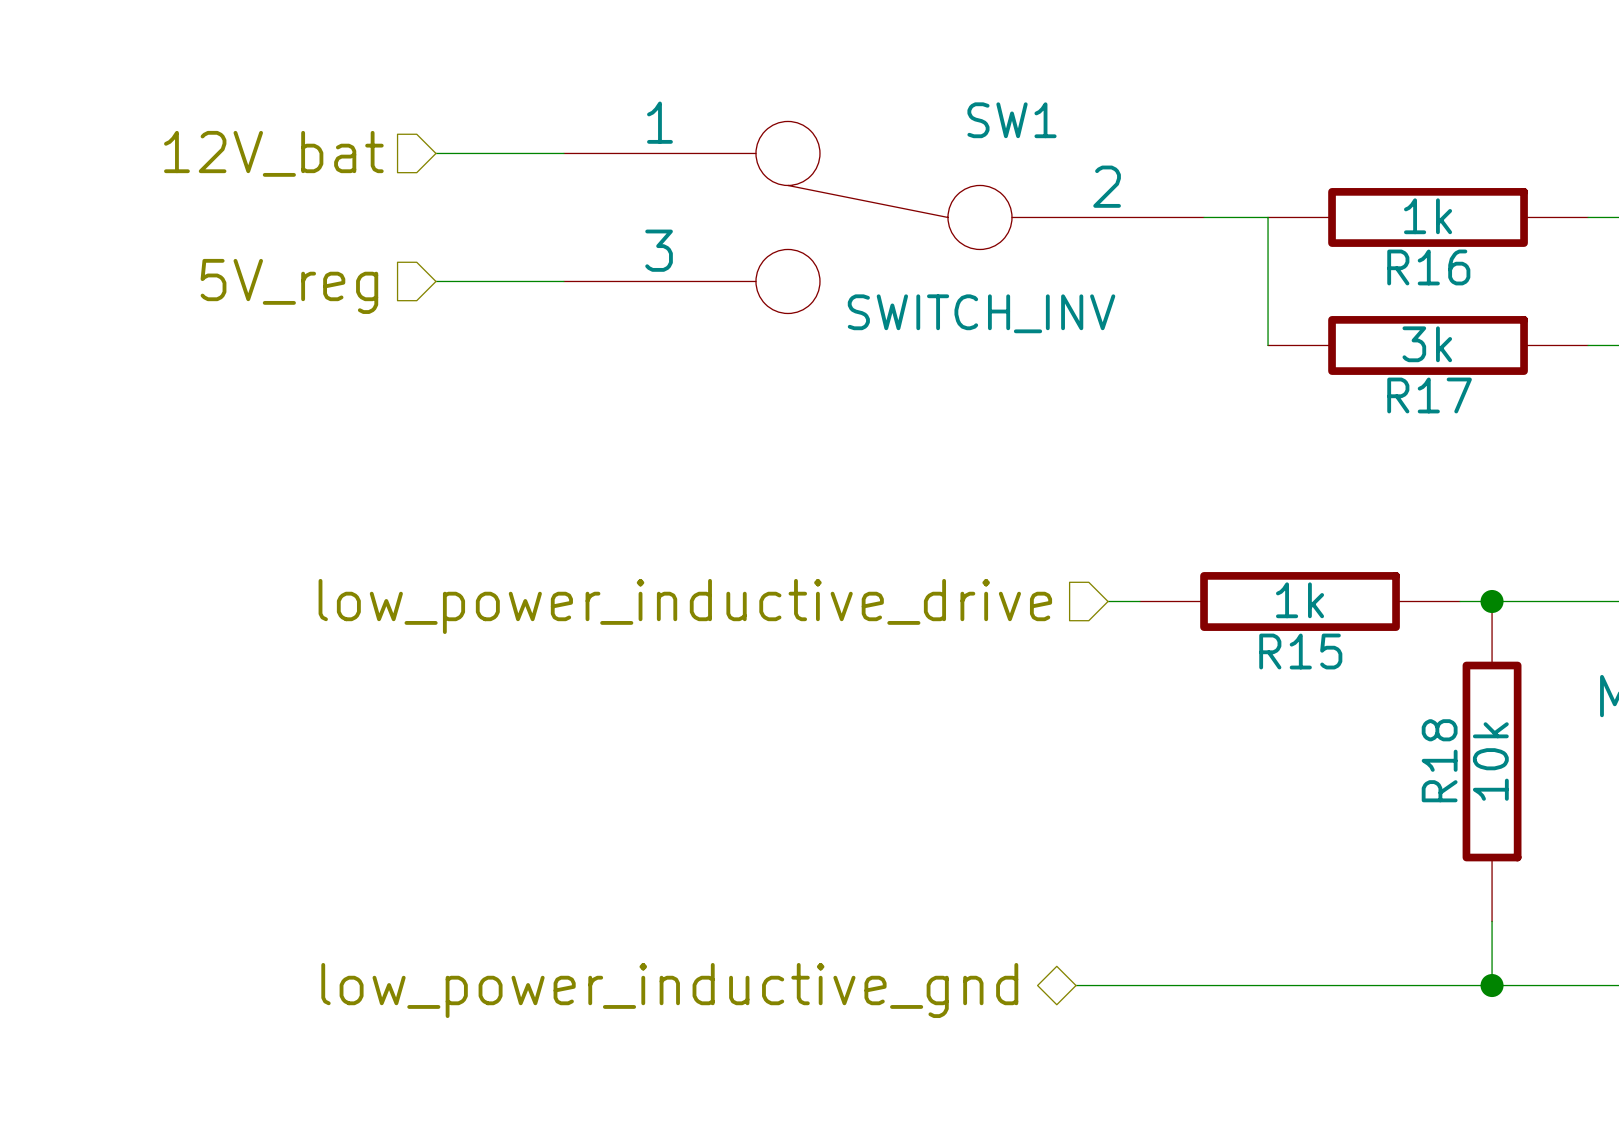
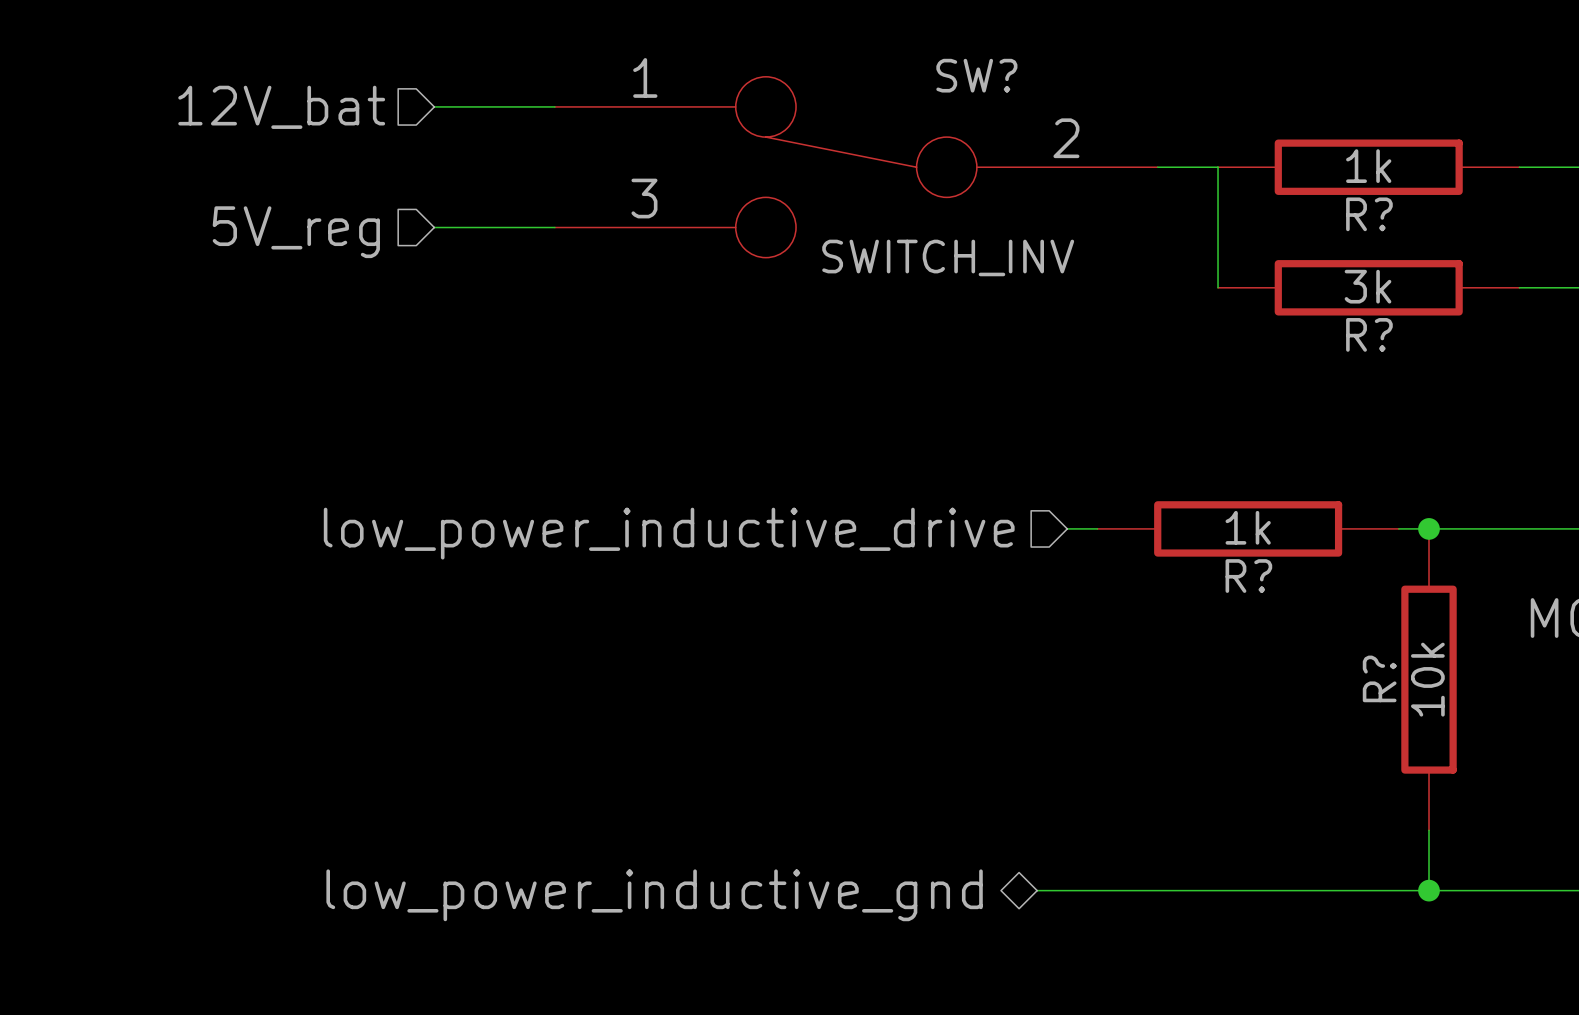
SW1 name: SW1 (1012, 120) -> SW? (976, 75)
R16 name: R16 (1428, 267) -> R? (1369, 214)
R17 name: R17 (1429, 395) -> R? (1369, 334)
R15 name: R15 (1300, 651) -> R? (1248, 576)
R18 name: R18 (1439, 760) -> R? (1379, 678)

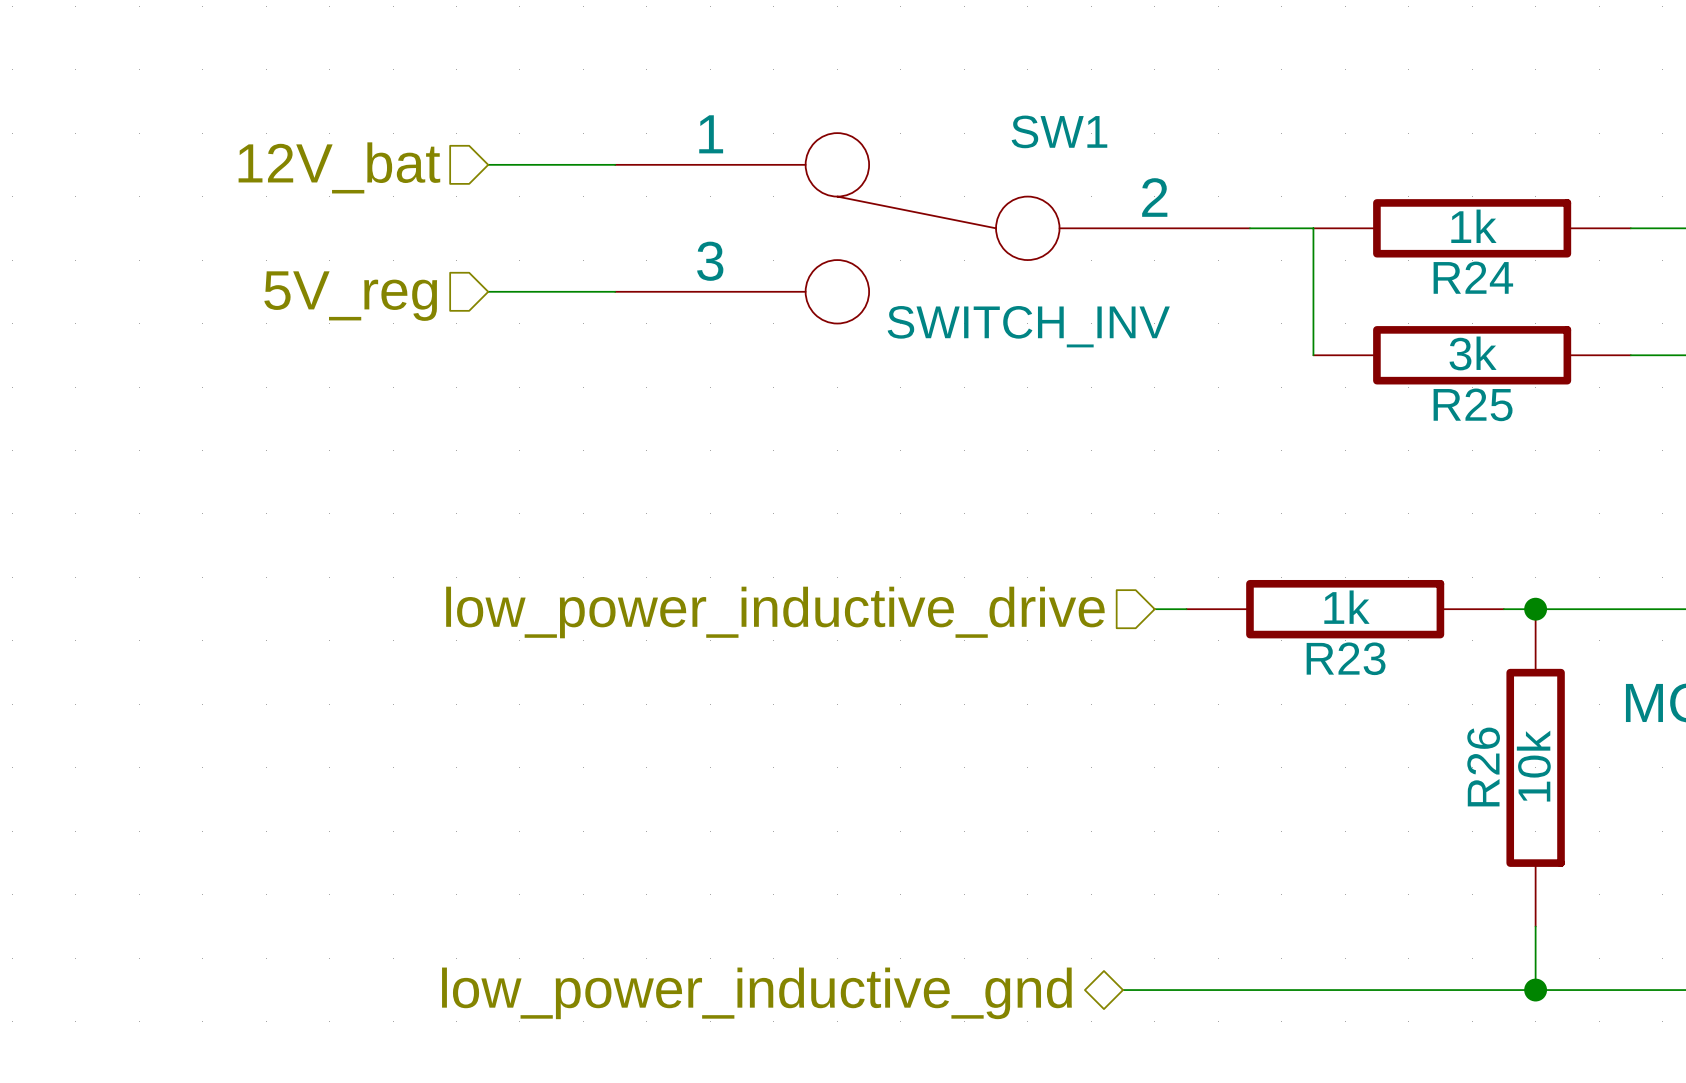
SW? name: SW? (976, 75) -> SW1 (1059, 131)
R? name: R? (1369, 214) -> R24 (1473, 277)
R? name: R? (1369, 334) -> R25 (1473, 404)
R? name: R? (1248, 576) -> R23 (1346, 658)
R? name: R? (1379, 678) -> R26 (1483, 767)

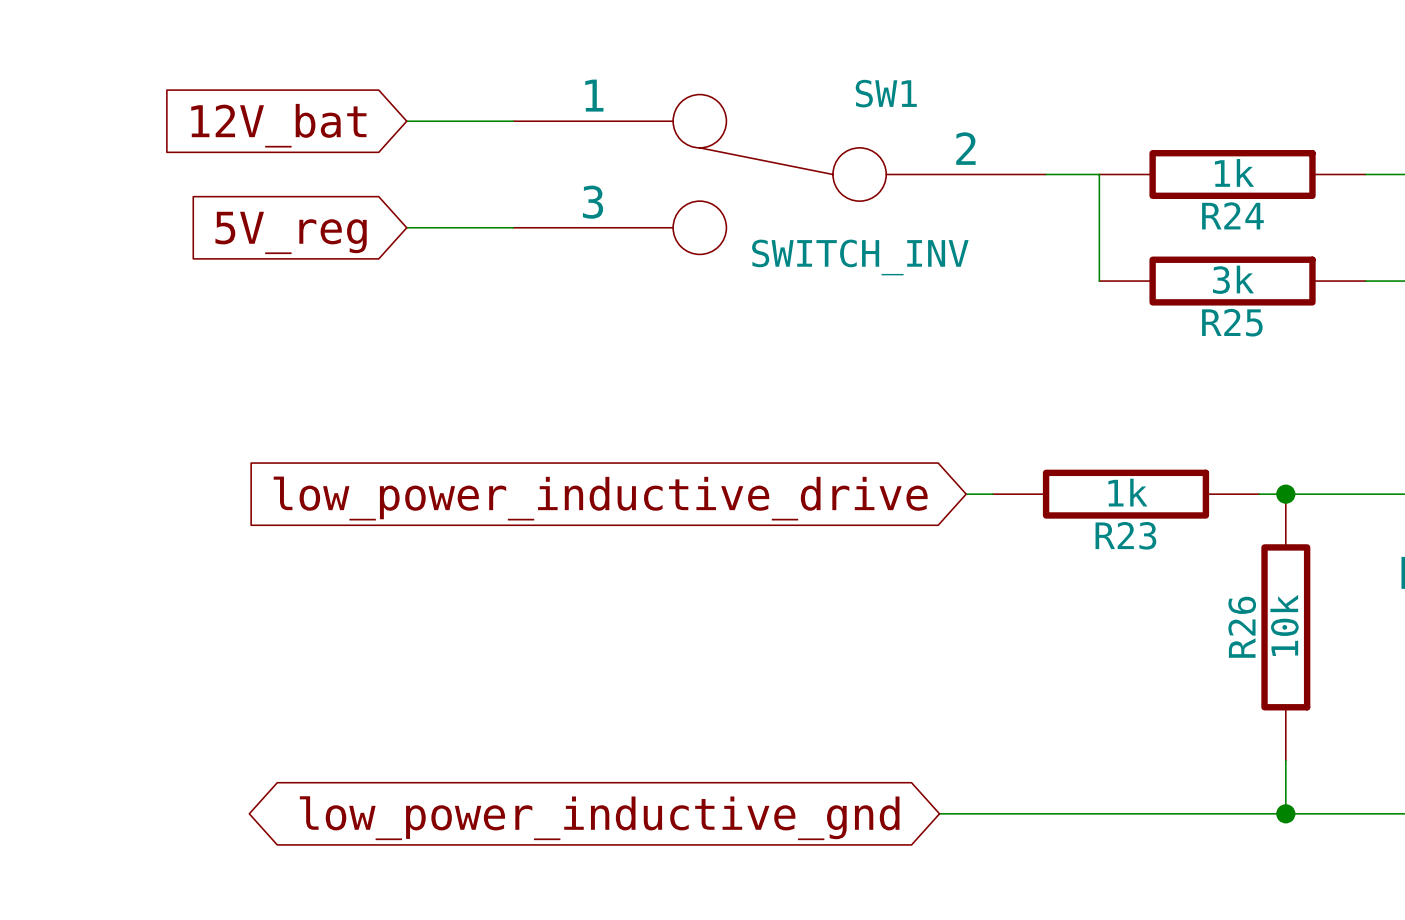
hierarchical label: 12V_bat (339, 167) -> none
global label: none -> 12V_bat (278, 125)
hierarchical label: 5V_reg (350, 296) -> none
global label: none -> 5V_reg (291, 232)
hierarchical label: low_power_inductive_drive (775, 612) -> none
global label: none -> low_power_inductive_drive (600, 498)
hierarchical label: low_power_inductive_gnd (756, 993) -> none
global label: none -> low_power_inductive_gnd (599, 818)

